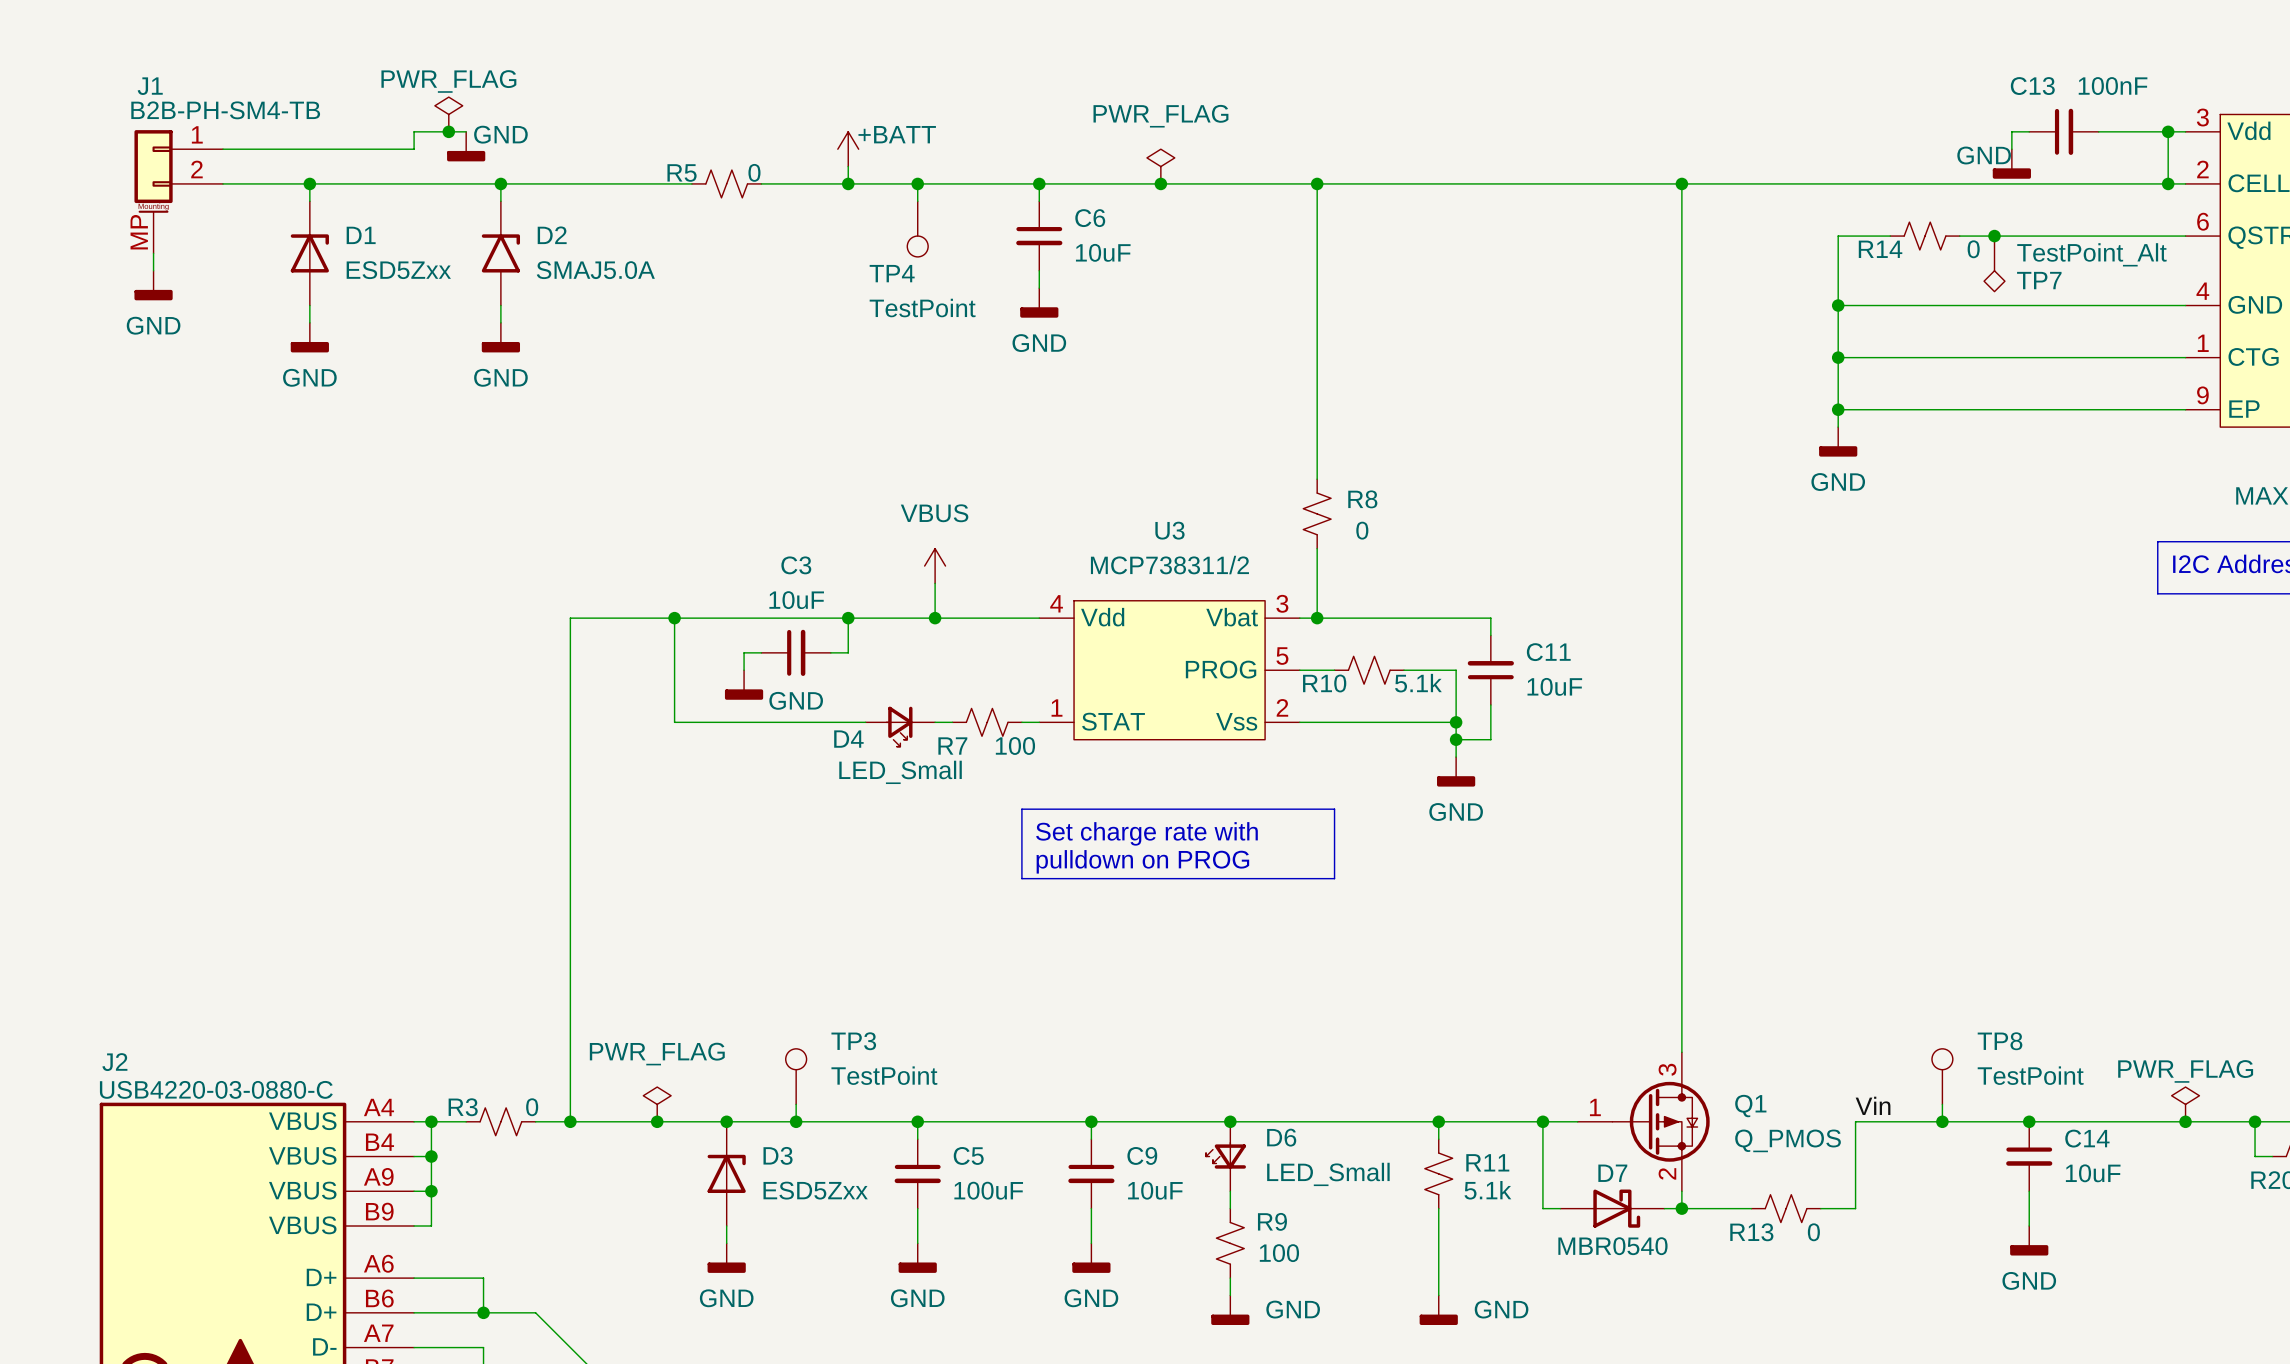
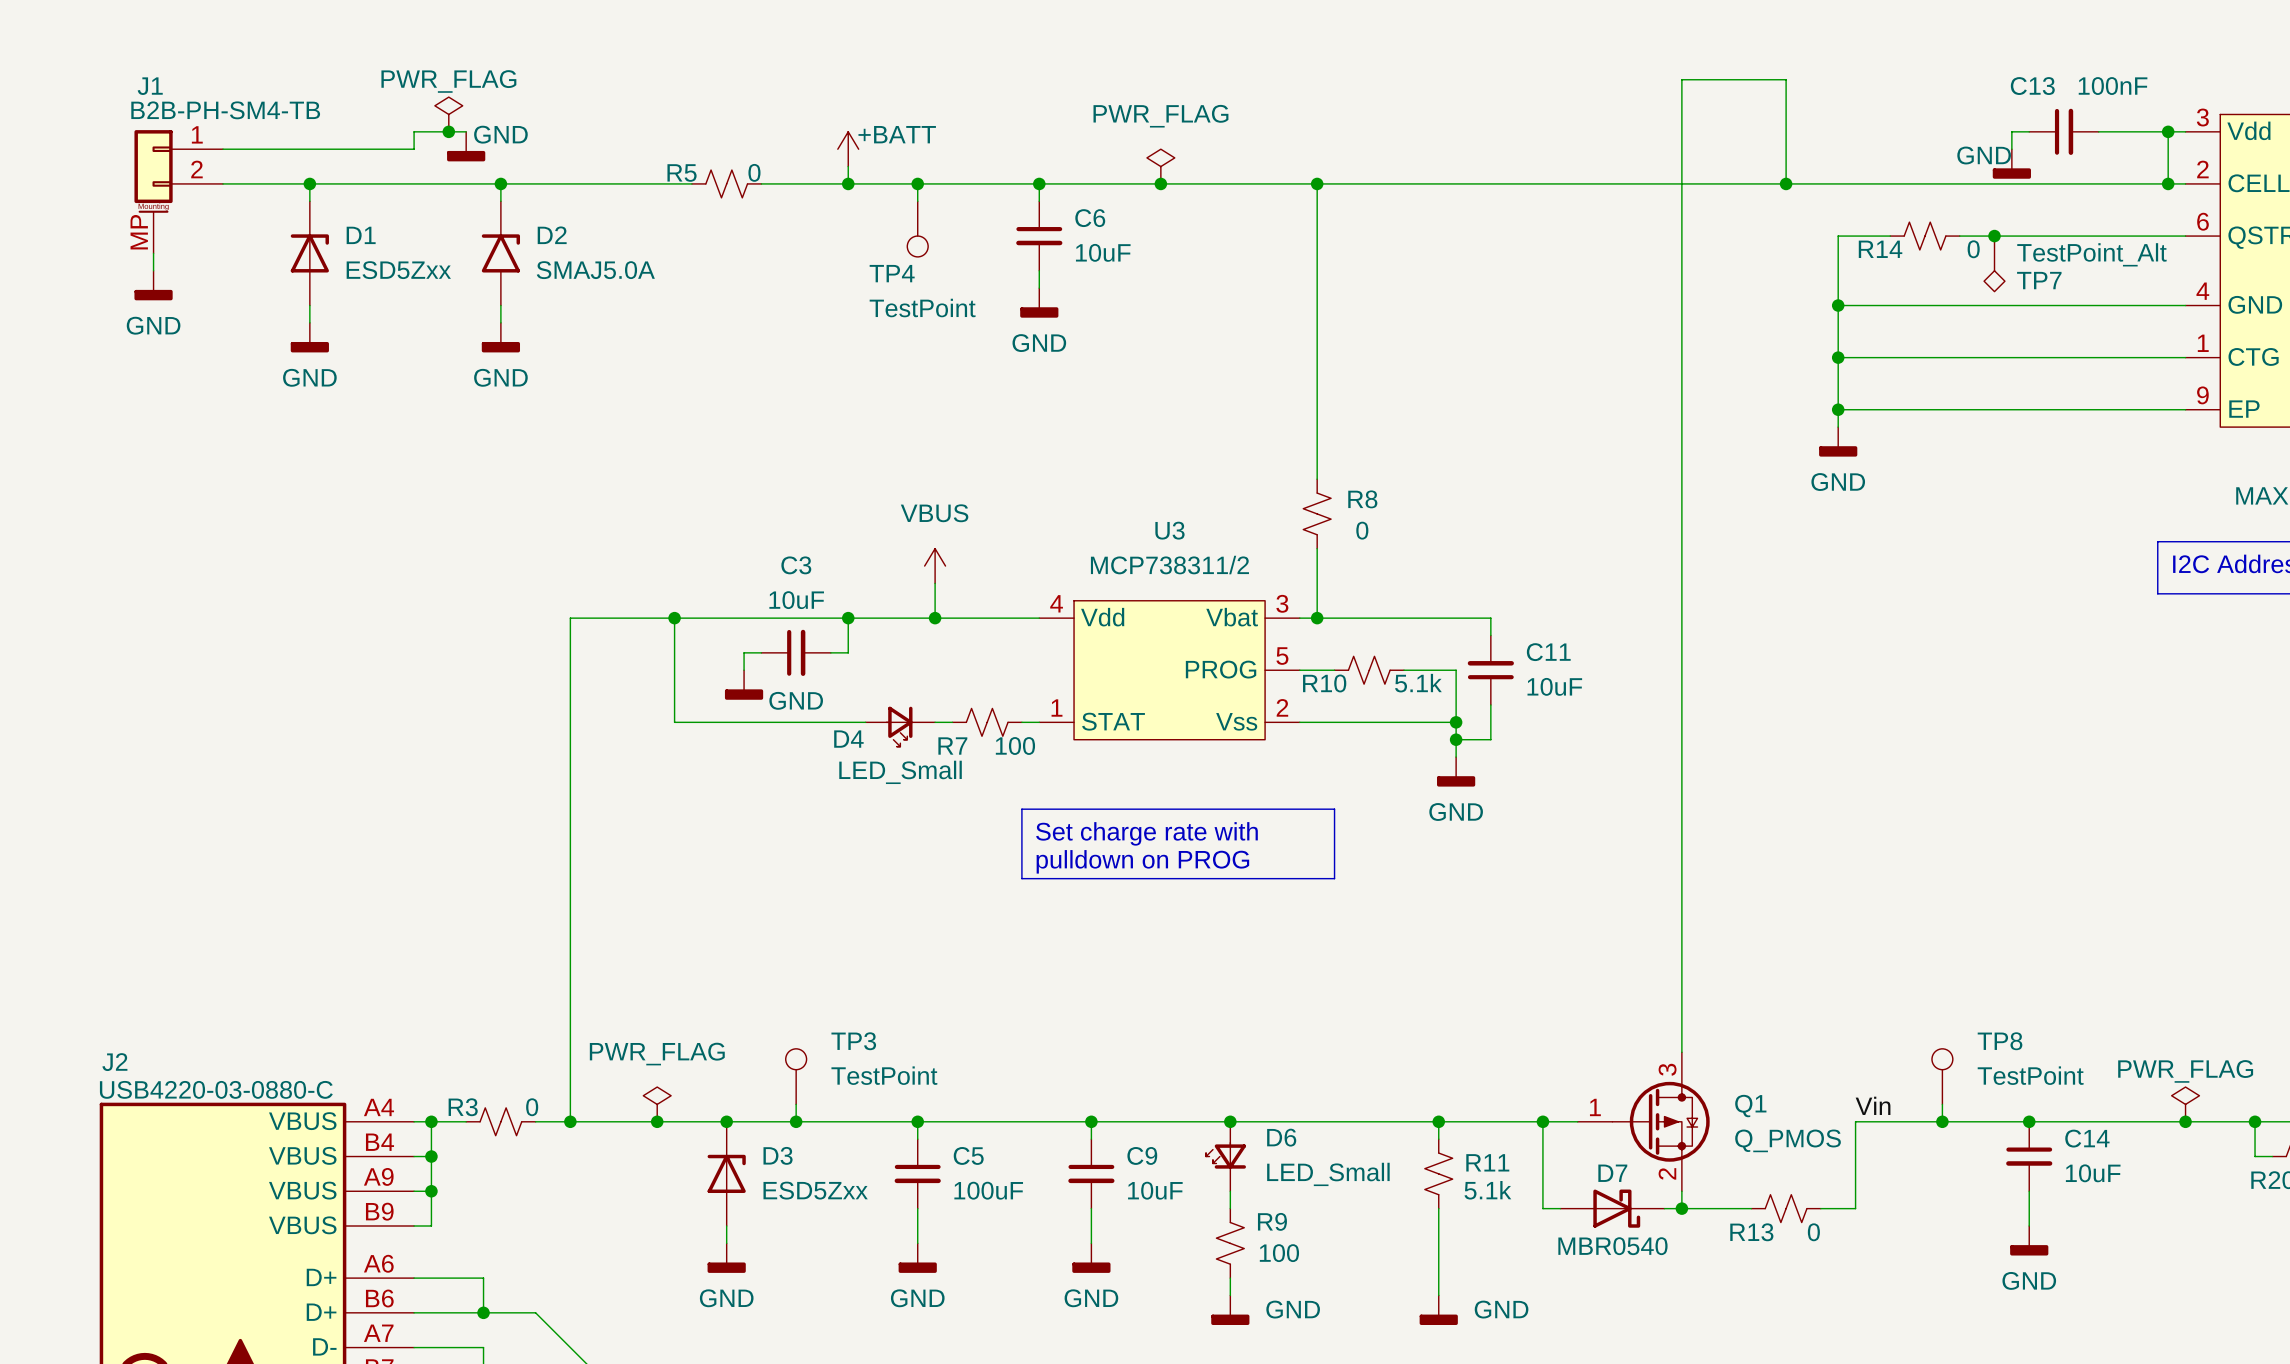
wire: none -> (1681, 183) (1681, 79) (1786, 79) (1786, 183)
junction: (1681, 183) -> none
junction: none -> (1786, 183)

